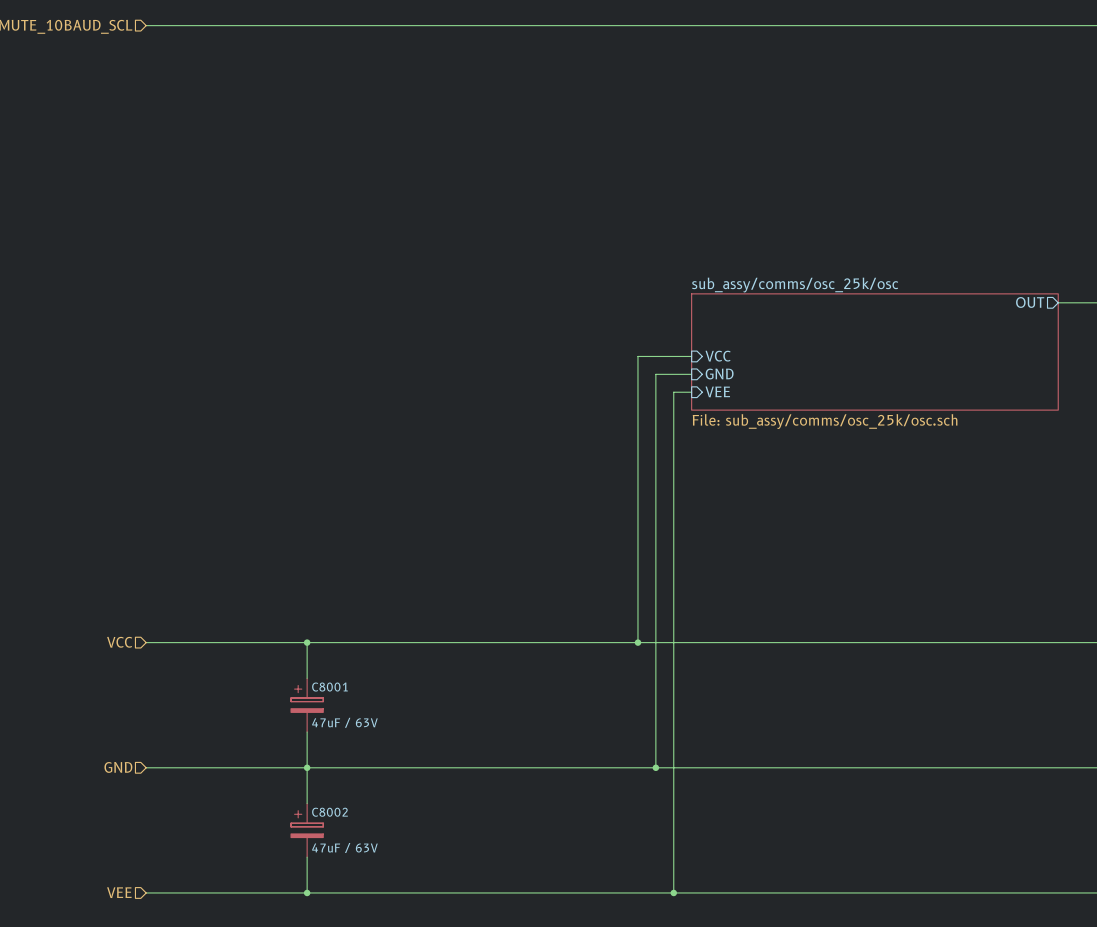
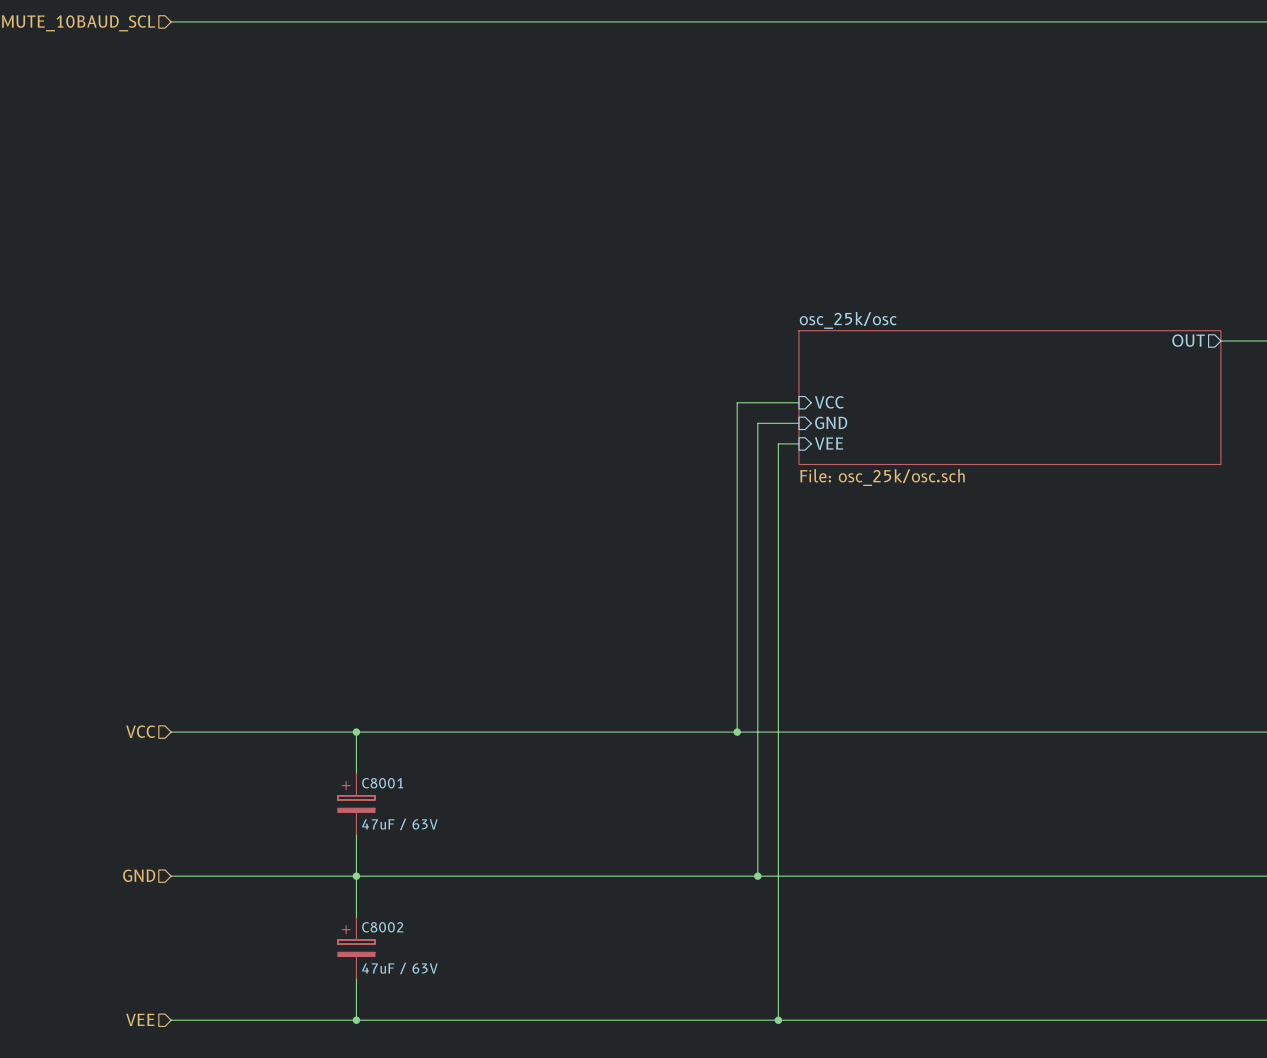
sheet sub_assy/comms/osc_25k/osc name: sub_assy/comms/osc_25k/osc (795, 285) -> osc_25k/osc (848, 320)
sheet sub_assy/comms/osc_25k/osc value: File: sub_assy/comms/osc_25k/osc.sch (825, 421) -> File: osc_25k/osc.sch (882, 477)

